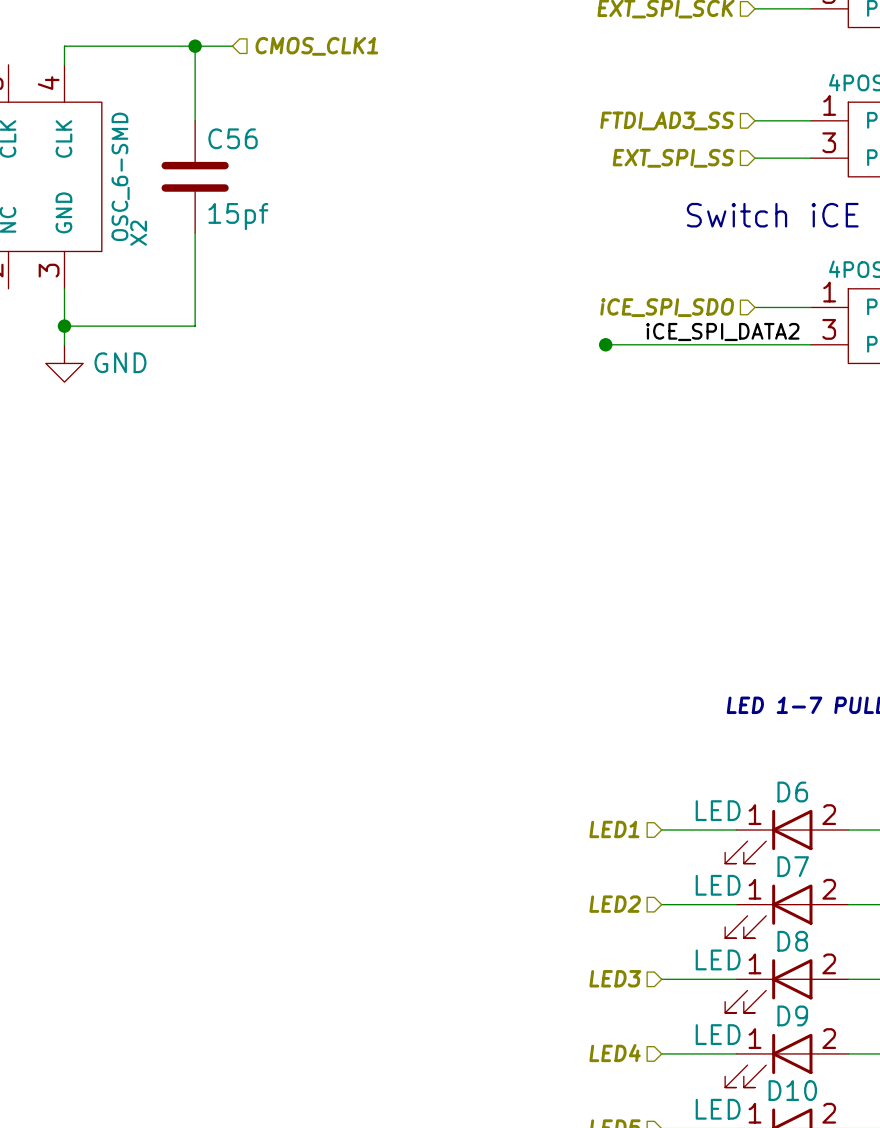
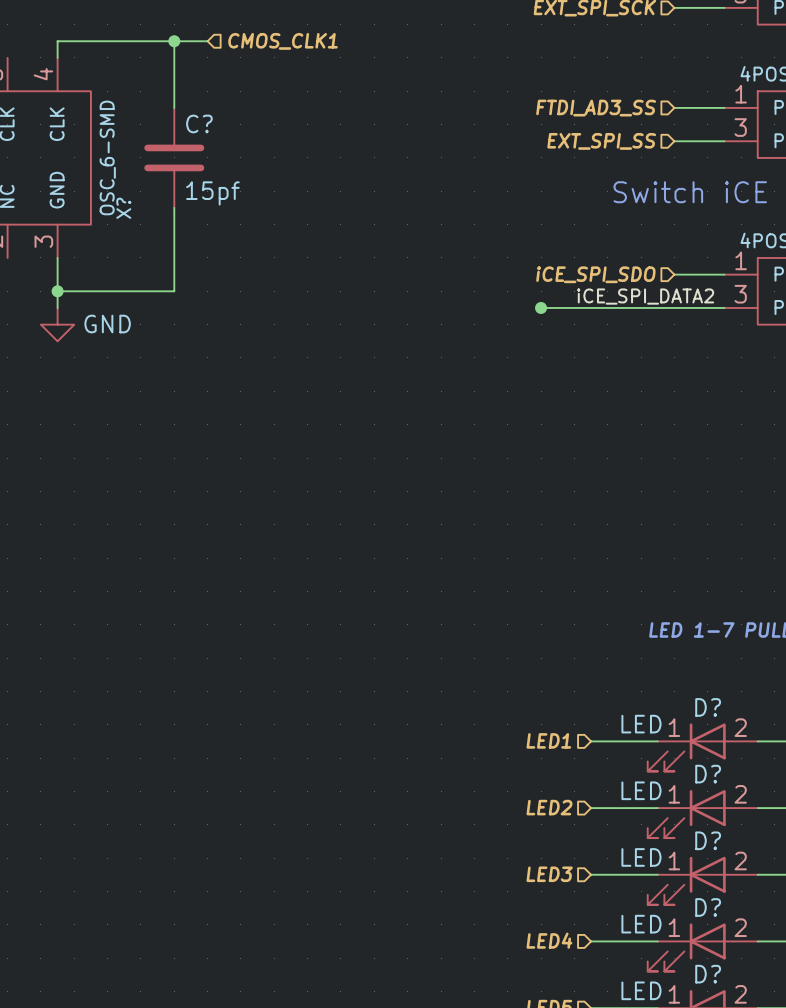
C56 name: C56 (233, 138) -> C? (199, 123)
X2 name: X2 (138, 233) -> X? (123, 208)
D6 name: D6 (792, 791) -> D? (708, 707)
D7 name: D7 (793, 866) -> D? (708, 774)
D8 name: D8 (792, 941) -> D? (708, 840)
D9 name: D9 (792, 1015) -> D? (708, 907)
D10 name: D10 (792, 1090) -> D? (708, 974)

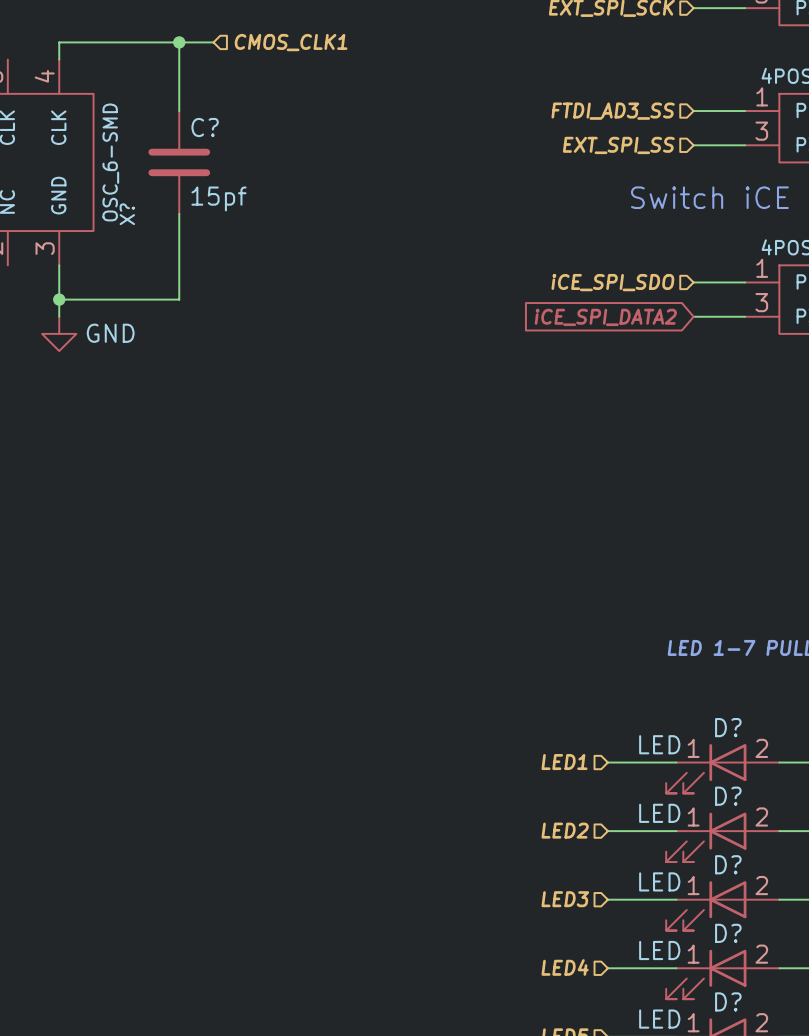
label: iCE_SPI_DATA2 (645, 296) -> none
wire: (541, 307) (674, 307) -> none
junction: (541, 307) -> none
global label: none -> iCE_SPI_DATA2 (605, 317)

